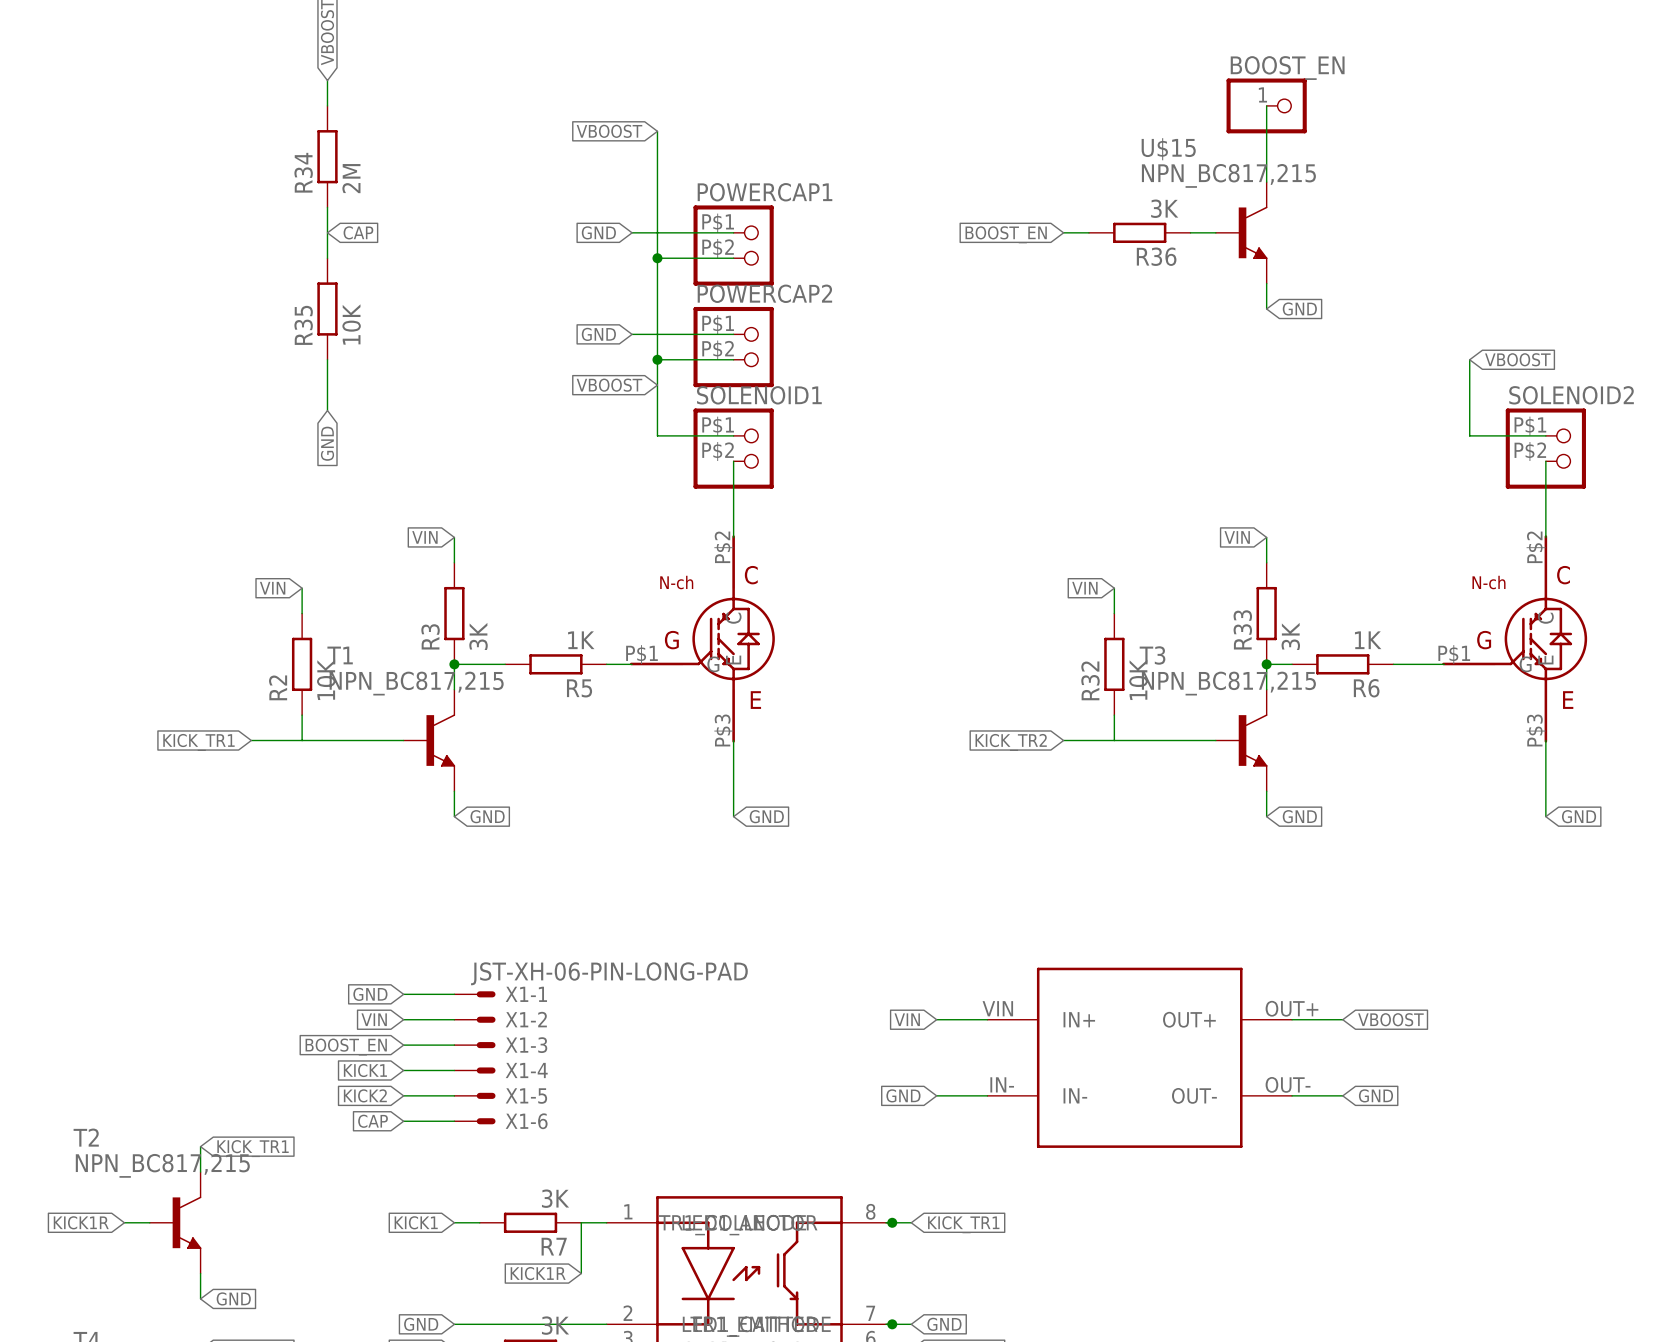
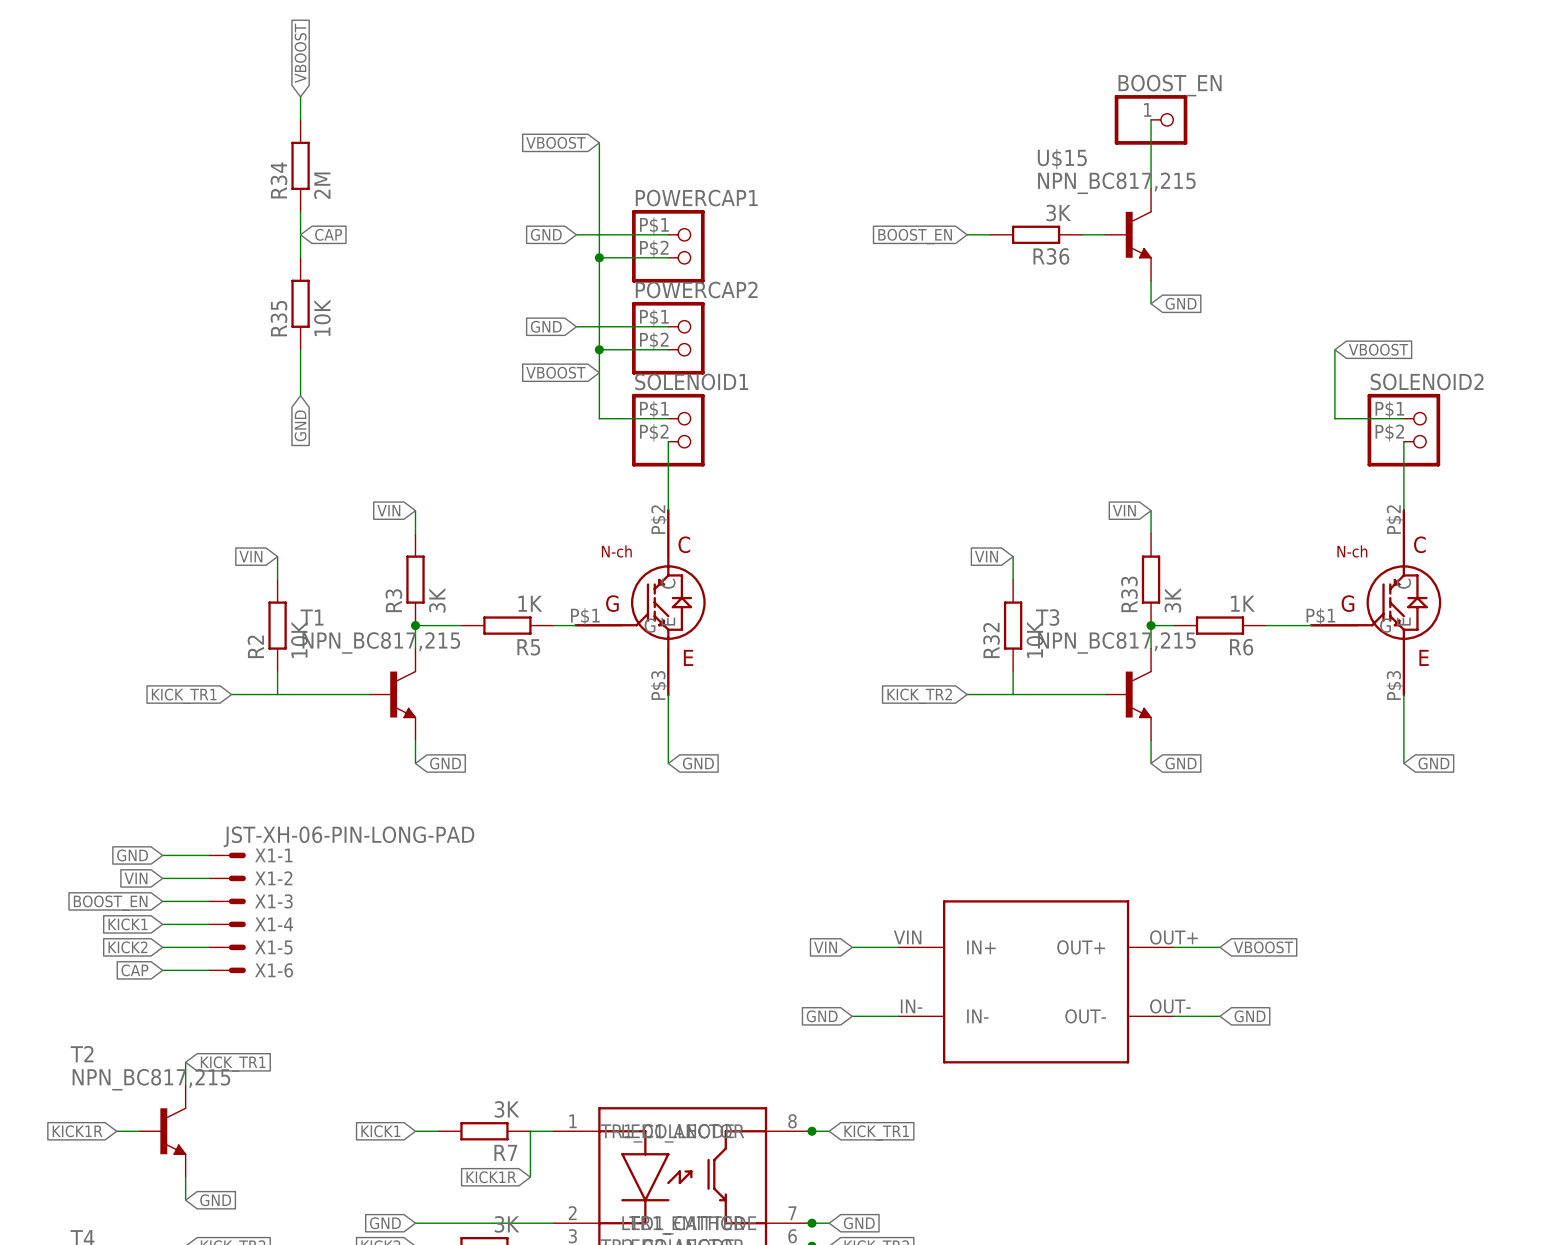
global label position: GND (370, 994) -> GND (132, 855)
wire: (403, 994) (454, 994) -> (162, 855) (208, 855)
X1-1 position: (474, 994) -> (227, 855)
global label position: VIN (374, 1019) -> VIN (135, 878)
wire: (403, 1019) (454, 1019) -> (162, 878) (208, 878)
X1-2 position: (474, 1019) -> (227, 878)
wire: (403, 1045) (454, 1045) -> (162, 901) (208, 901)
X1-3 position: (474, 1045) -> (227, 901)
global label position: BOOST_EN (346, 1047) -> BOOST_EN (110, 903)
global label position: KICK1 (365, 1070) -> KICK1 (128, 924)
wire: (403, 1070) (454, 1070) -> (162, 924) (208, 924)
X1-4 position: (474, 1070) -> (227, 924)
global label position: KICK2 (365, 1095) -> KICK2 (127, 947)
wire: (403, 1095) (454, 1095) -> (162, 947) (208, 947)
X1-5 position: (474, 1095) -> (227, 947)
global label position: CAP (373, 1121) -> CAP (134, 970)
wire: (403, 1121) (454, 1121) -> (162, 970) (208, 970)
X1-6 position: (474, 1121) -> (227, 970)

